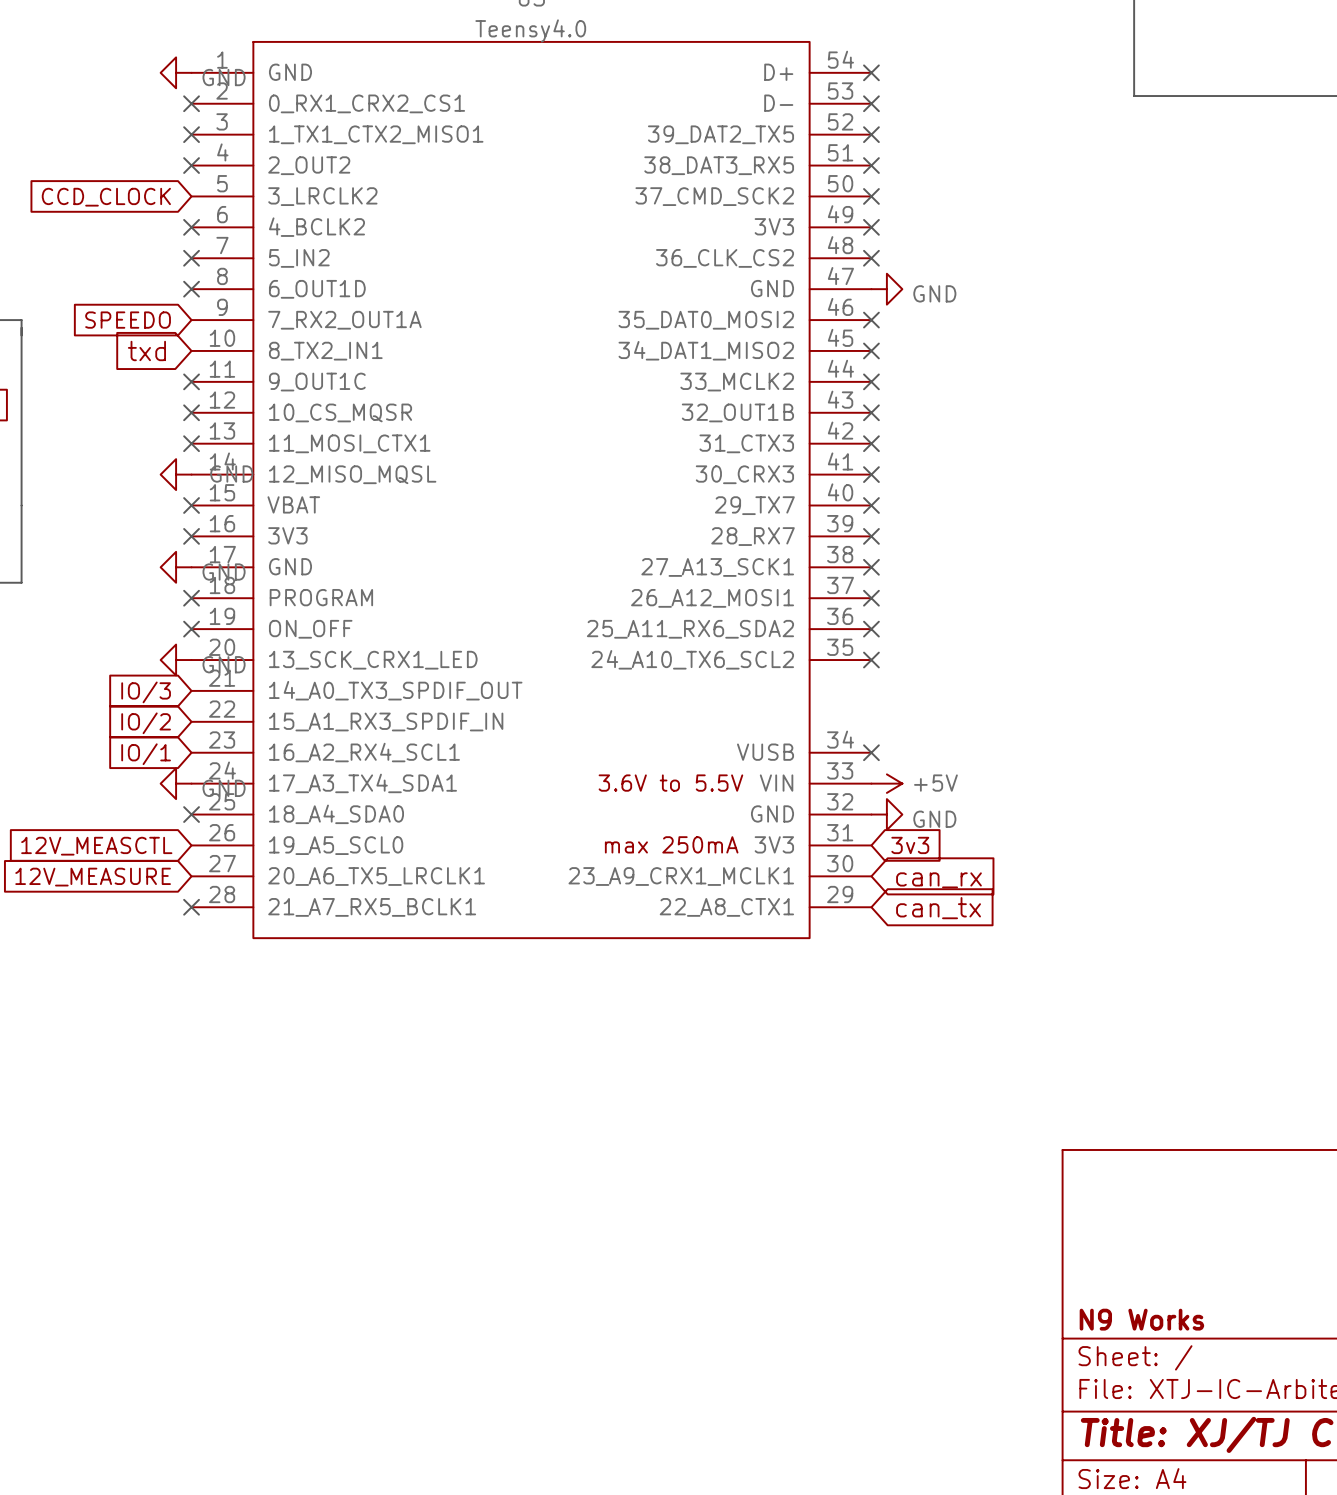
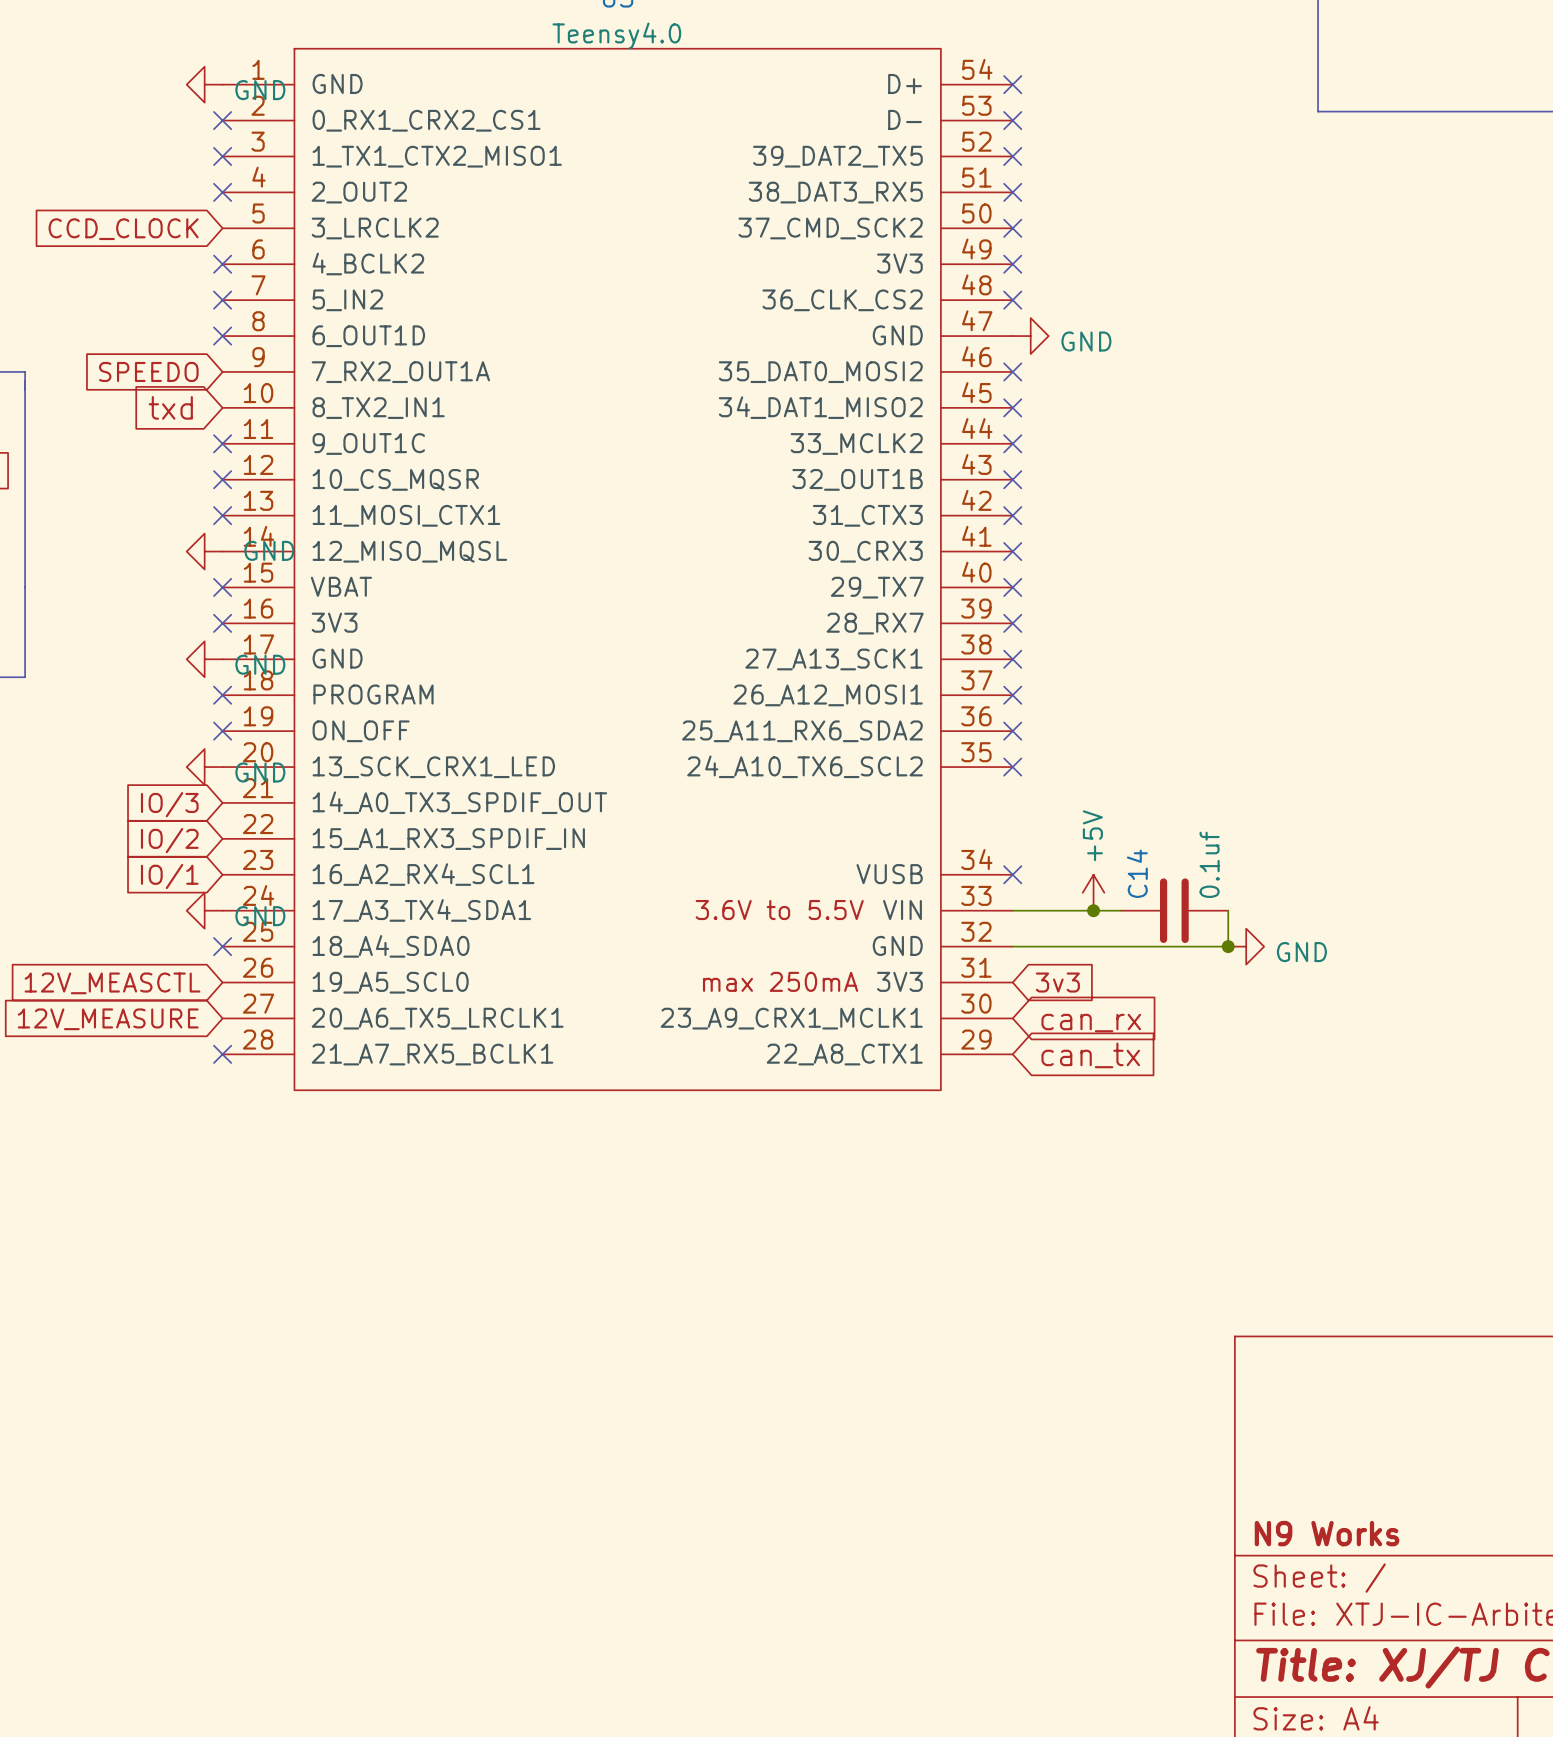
wire: none -> (1012, 910) (1120, 910)
power symbol rotation: 0° (886, 783) -> 90° counterclockwise (1093, 892)
power symbol position: +5V (886, 783) -> +5V (1093, 892)
junction: none -> (1093, 910)
C14: none -> 0.1uf (1174, 910)
wire: none -> (1228, 910) (1228, 946) (1012, 946)
power symbol position: GND (886, 814) -> GND (1246, 946)
junction: none -> (1228, 946)

